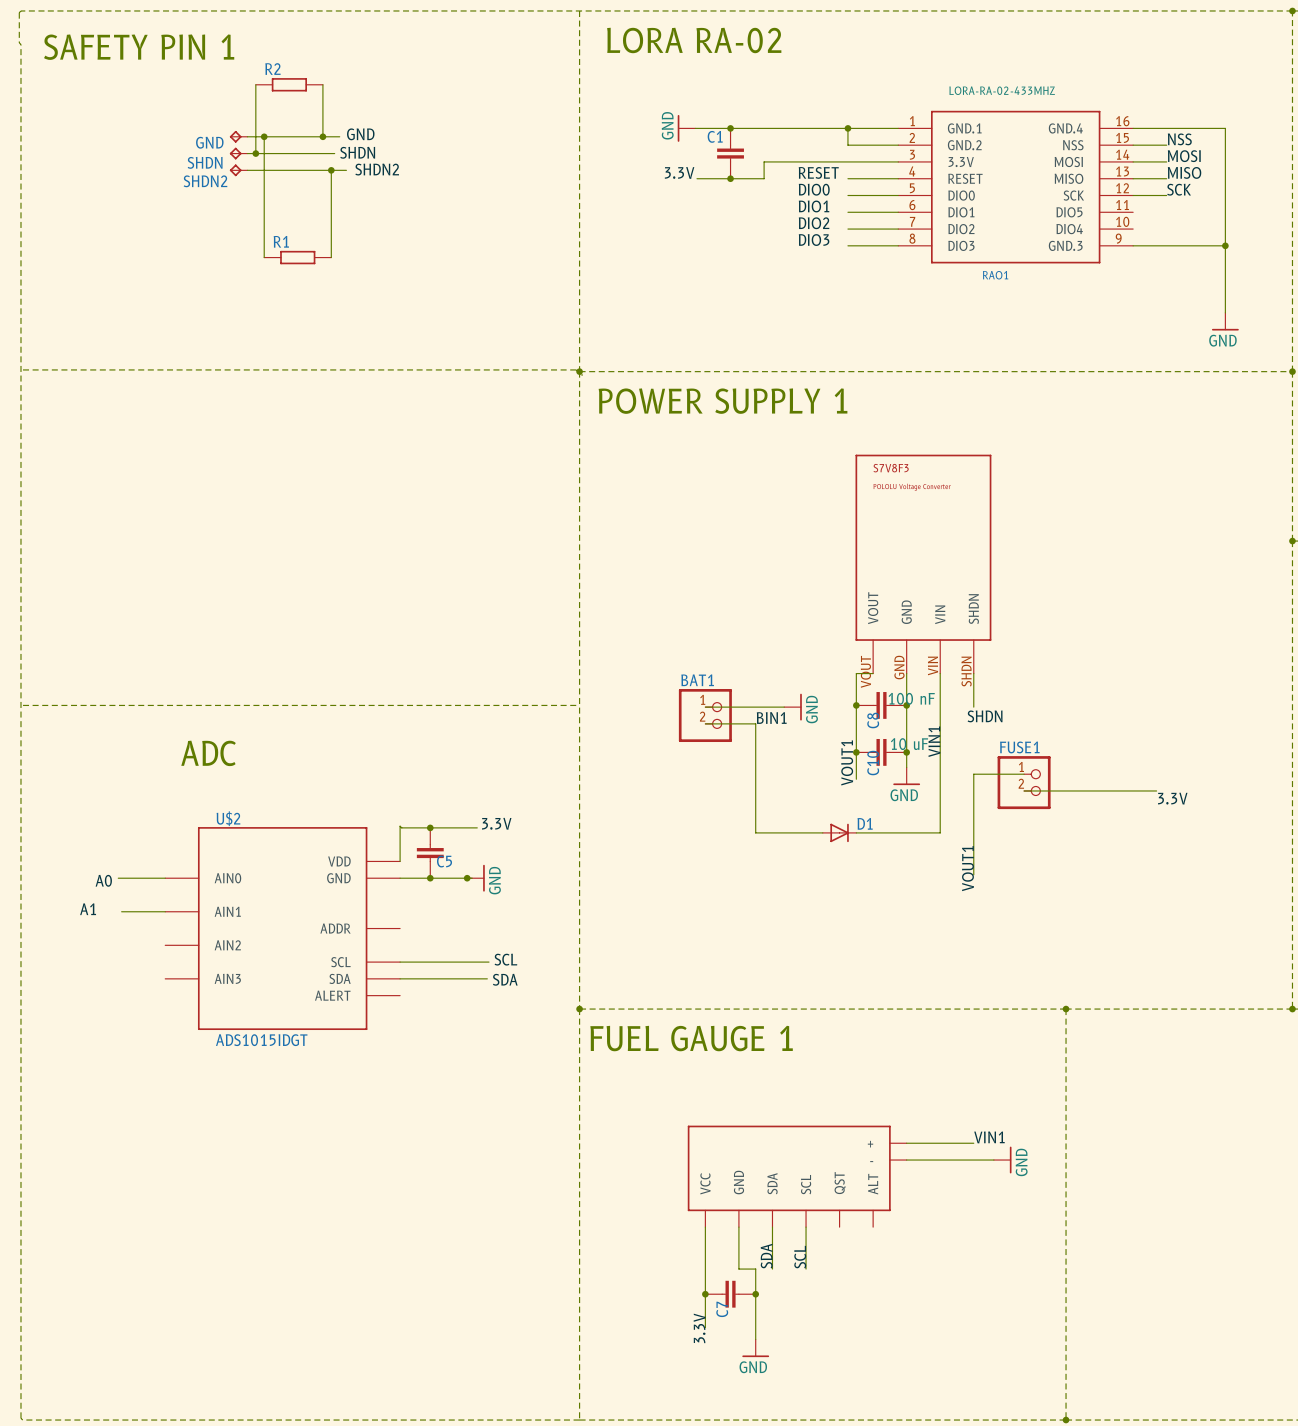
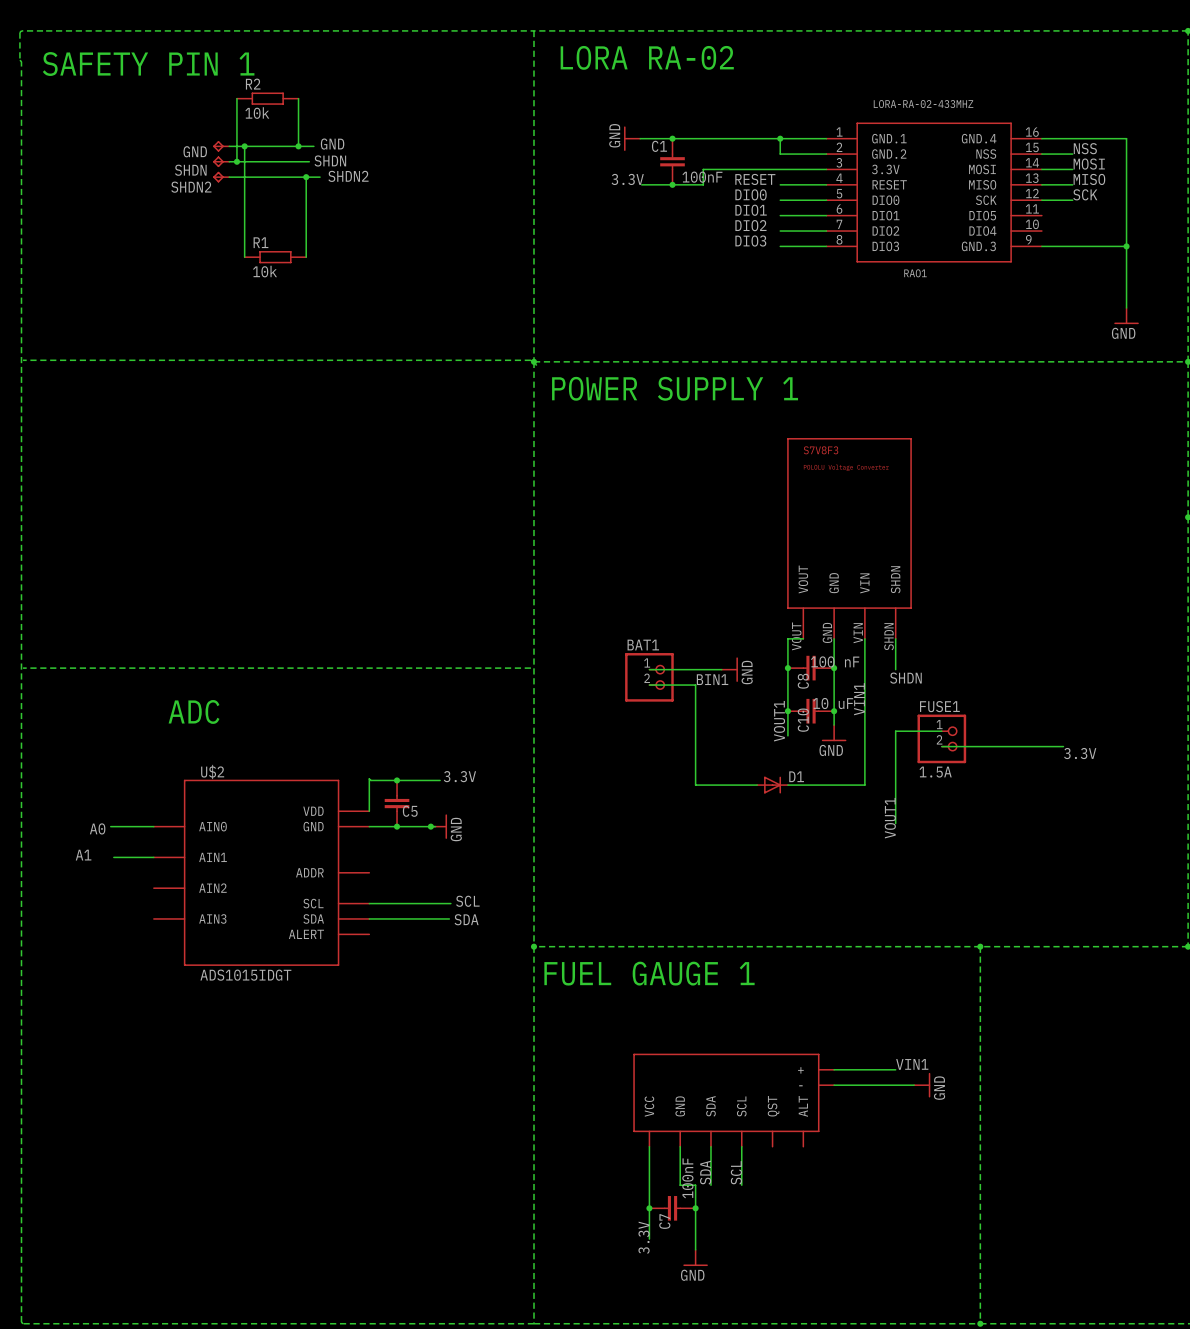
R2 value: none -> 10k (257, 113)
C1 value: none -> 100nF (702, 177)
R1 value: none -> 10k (265, 271)
FUSE1 value: none -> 1.5A (935, 772)
C7 value: none -> 100nF (687, 1178)

